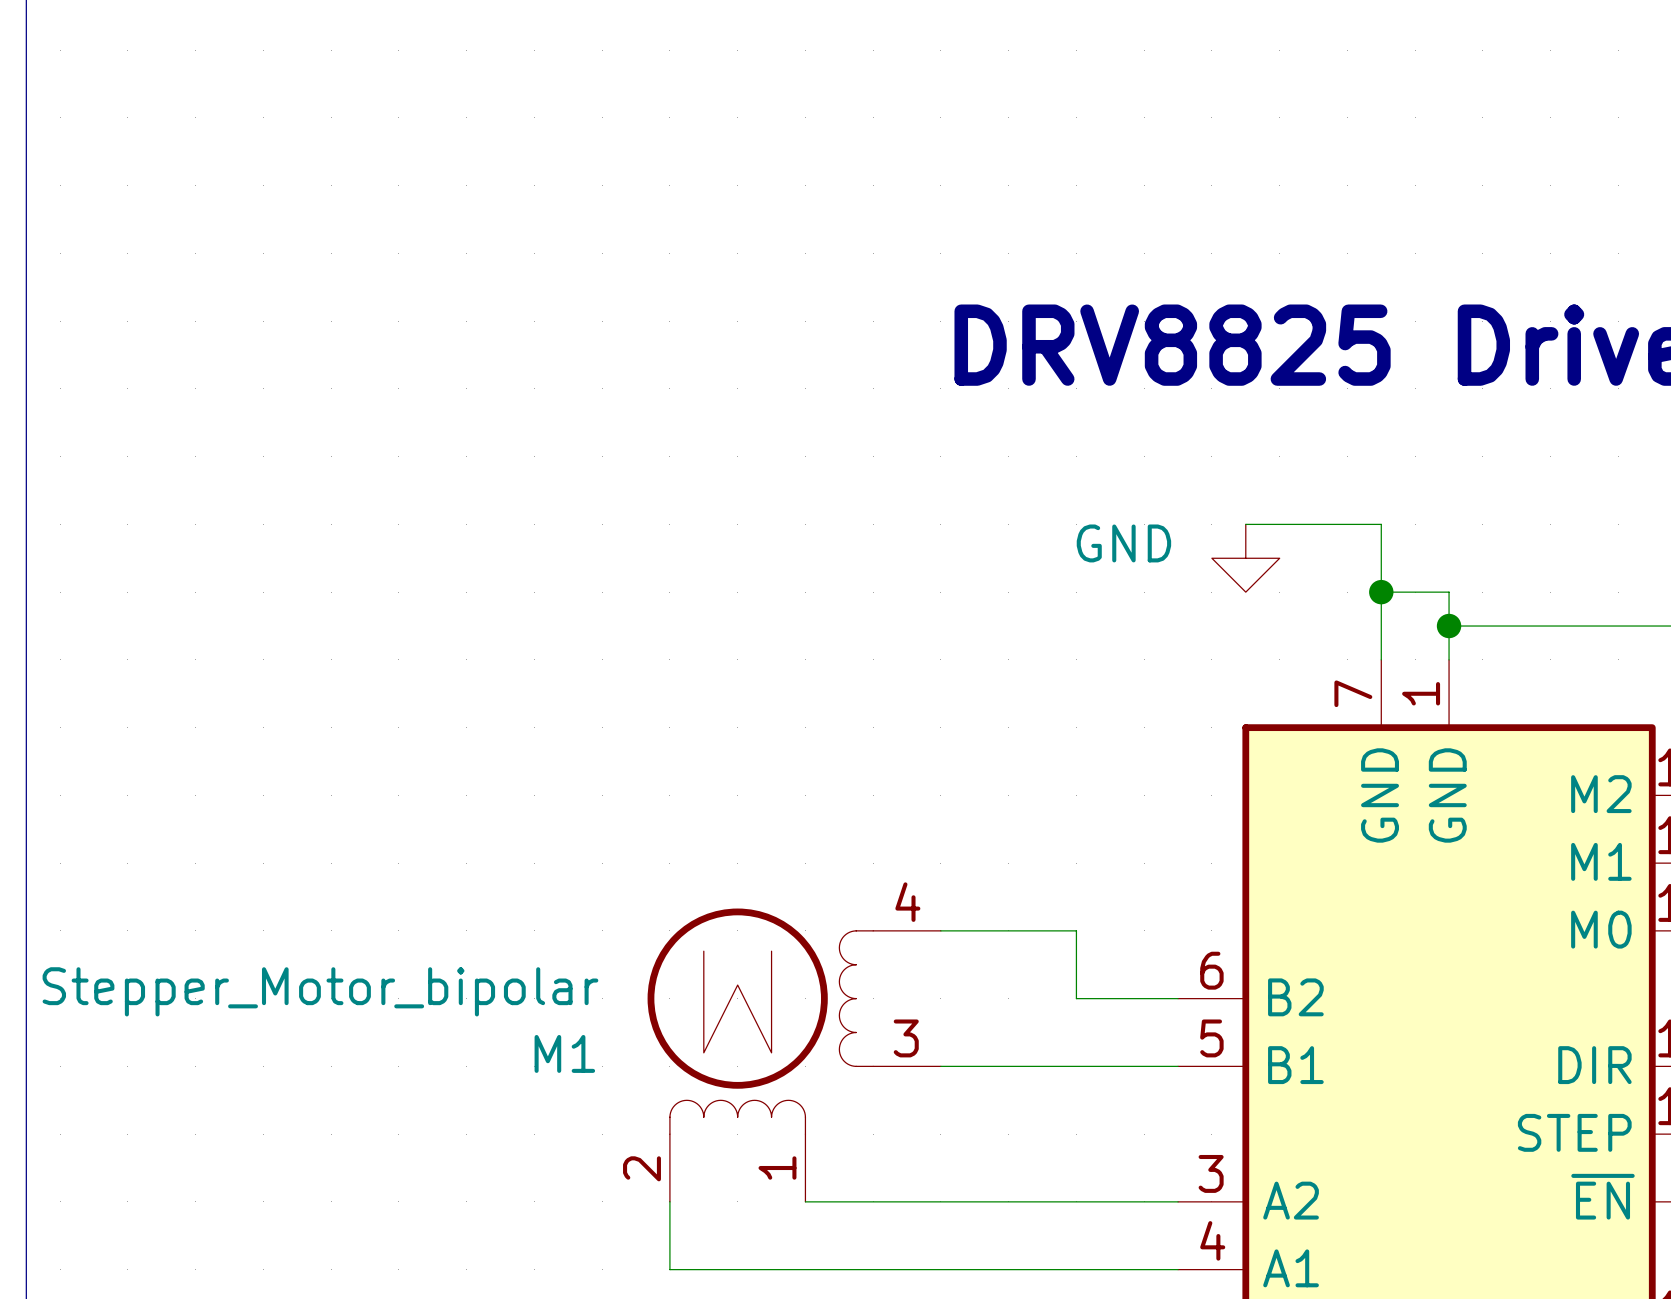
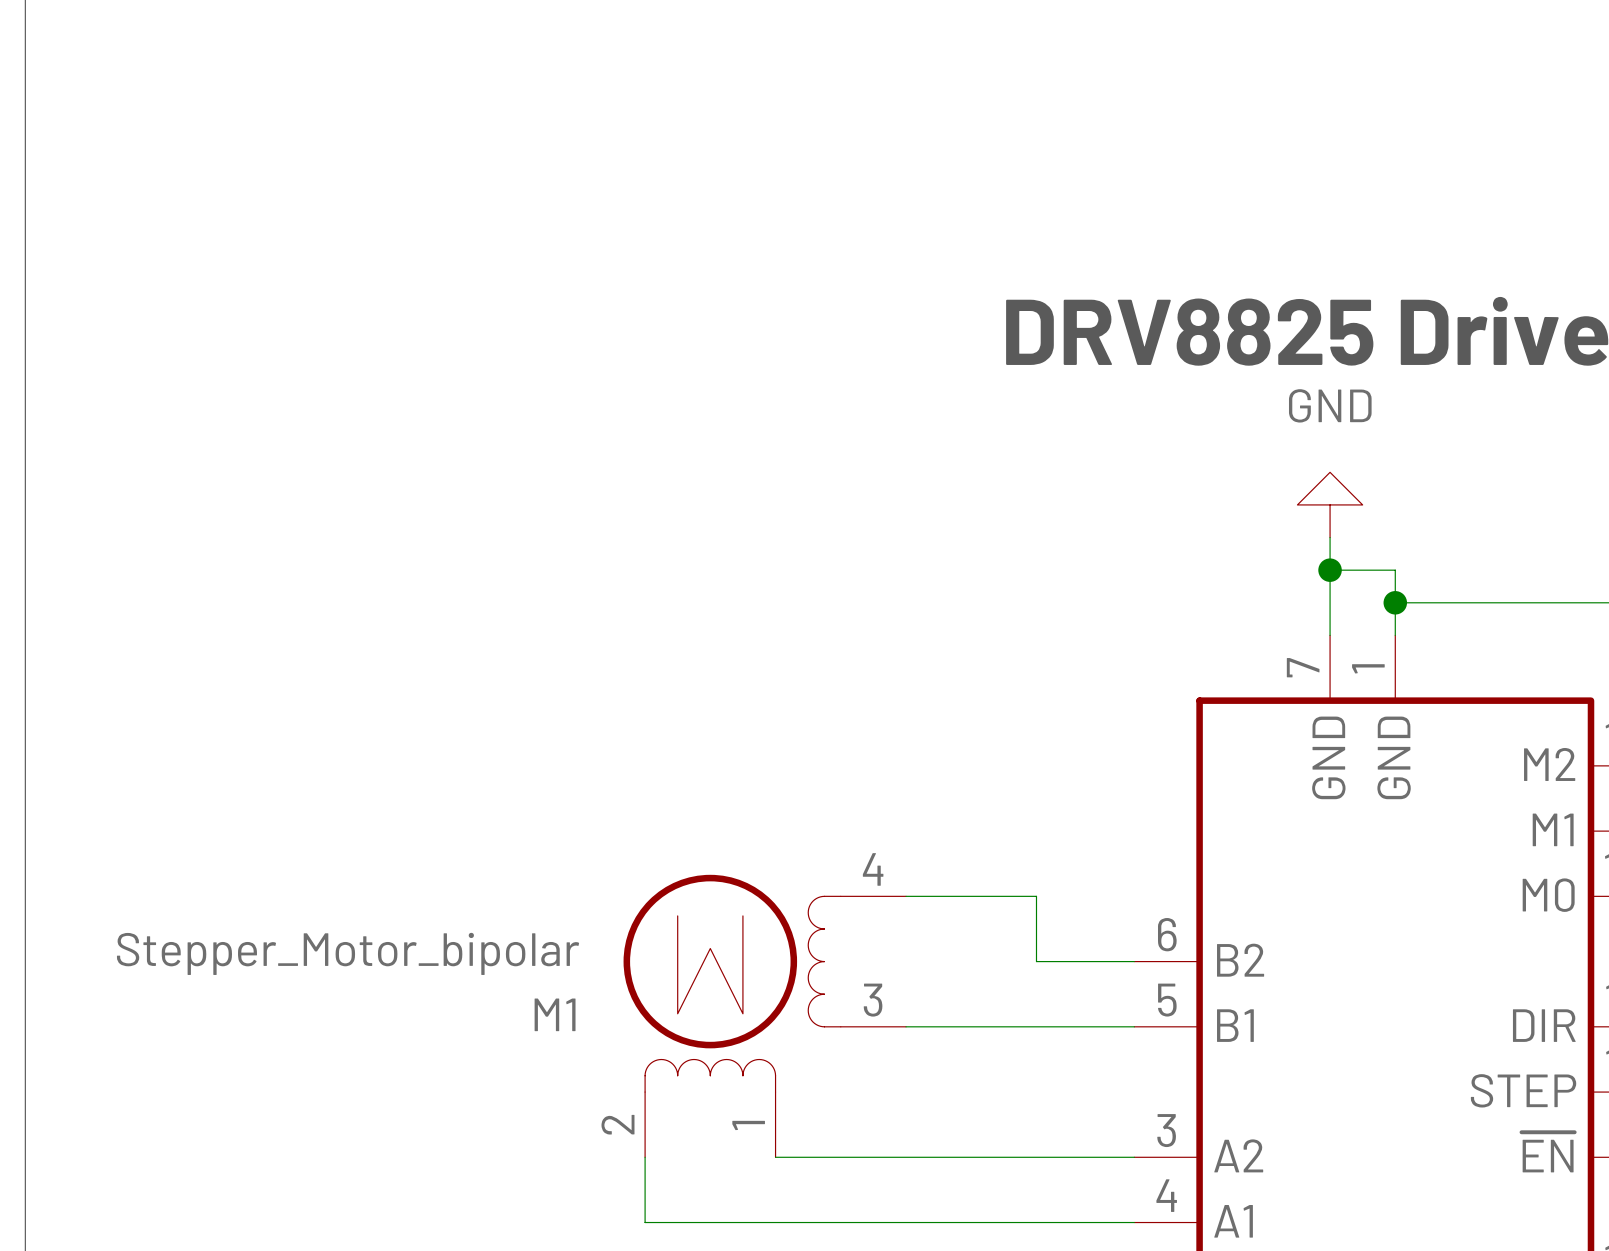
wire: (1245, 524) (1381, 524) (1381, 558) -> none
power symbol text position: GND (1123, 543) -> GND (1330, 405)
power symbol rotation: 0° (1245, 558) -> 180° (1330, 504)
power symbol position: GND (1245, 558) -> GND (1330, 504)

